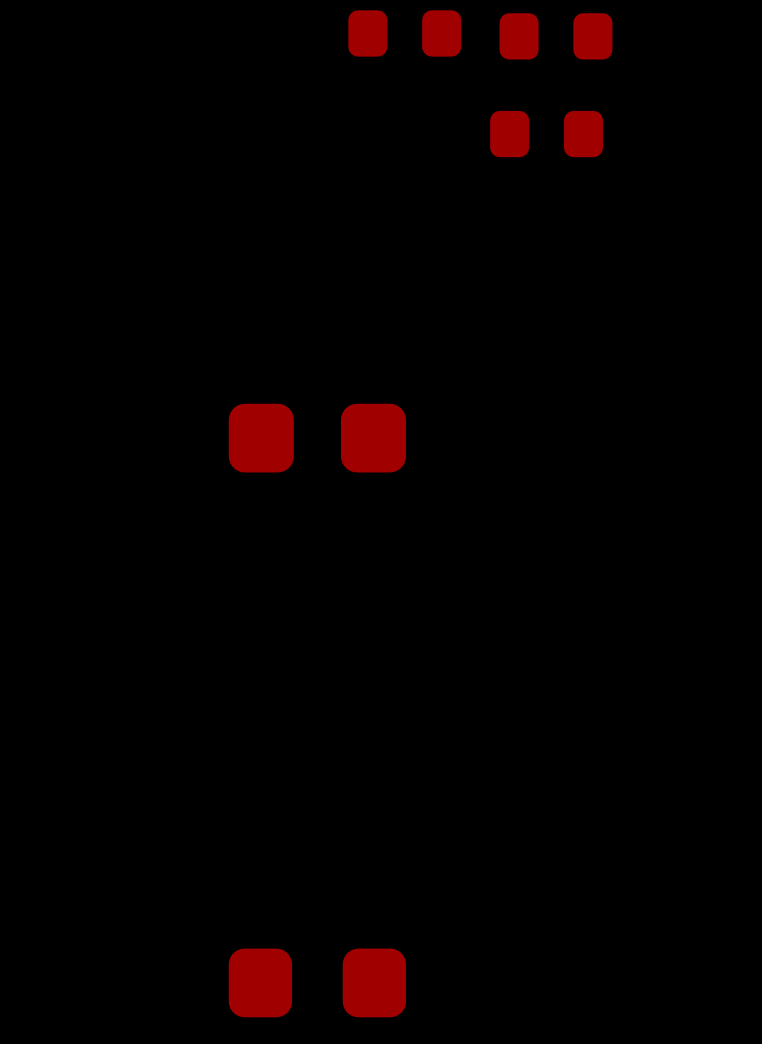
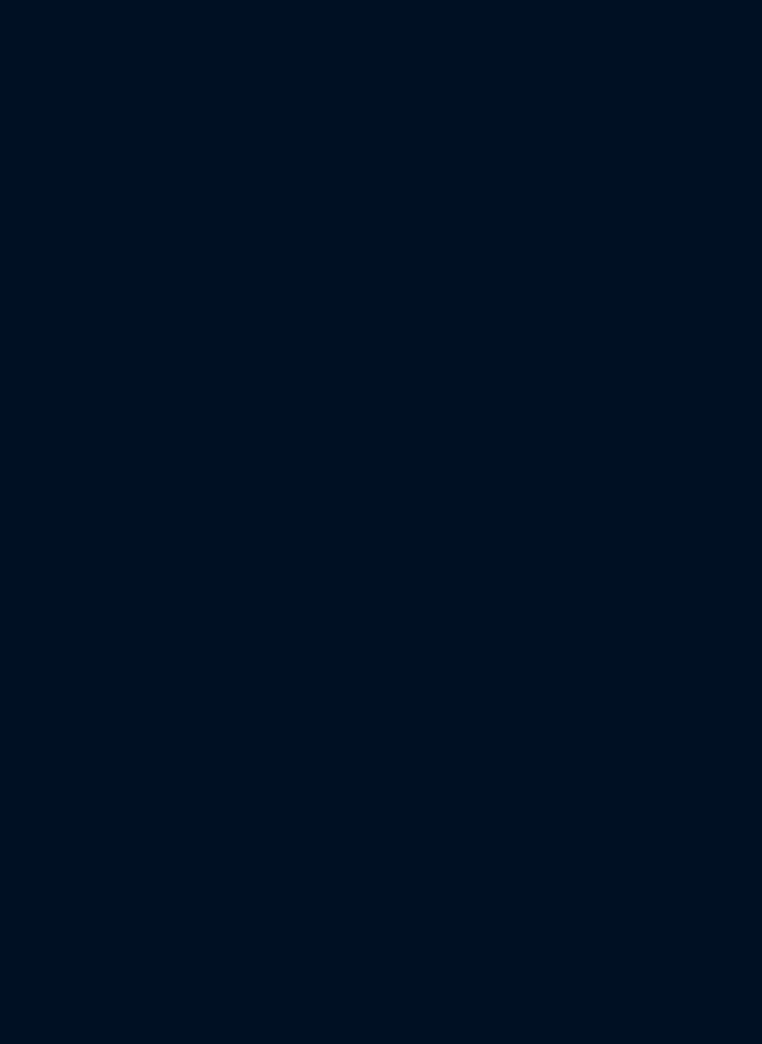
part: (404, 33) -> none
part: (555, 36) -> none
part: (546, 134) -> none
part: (317, 438) -> none
part: (317, 982) -> none

